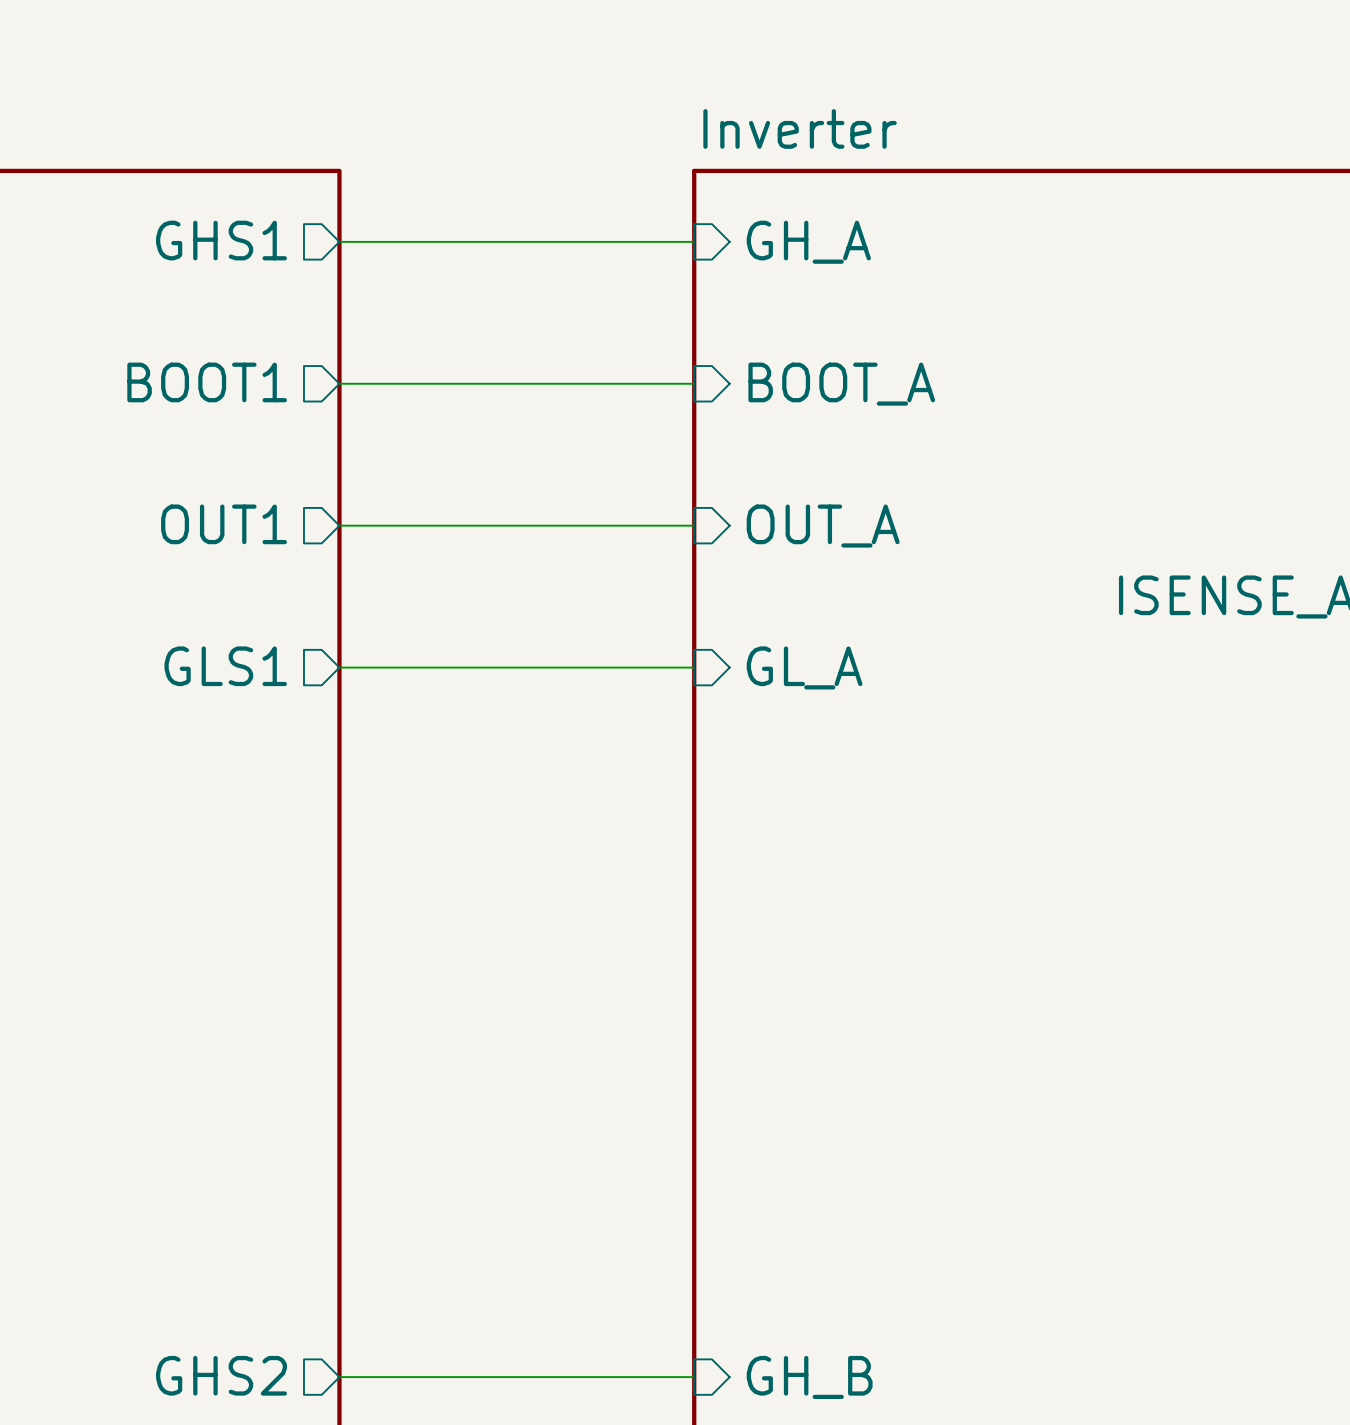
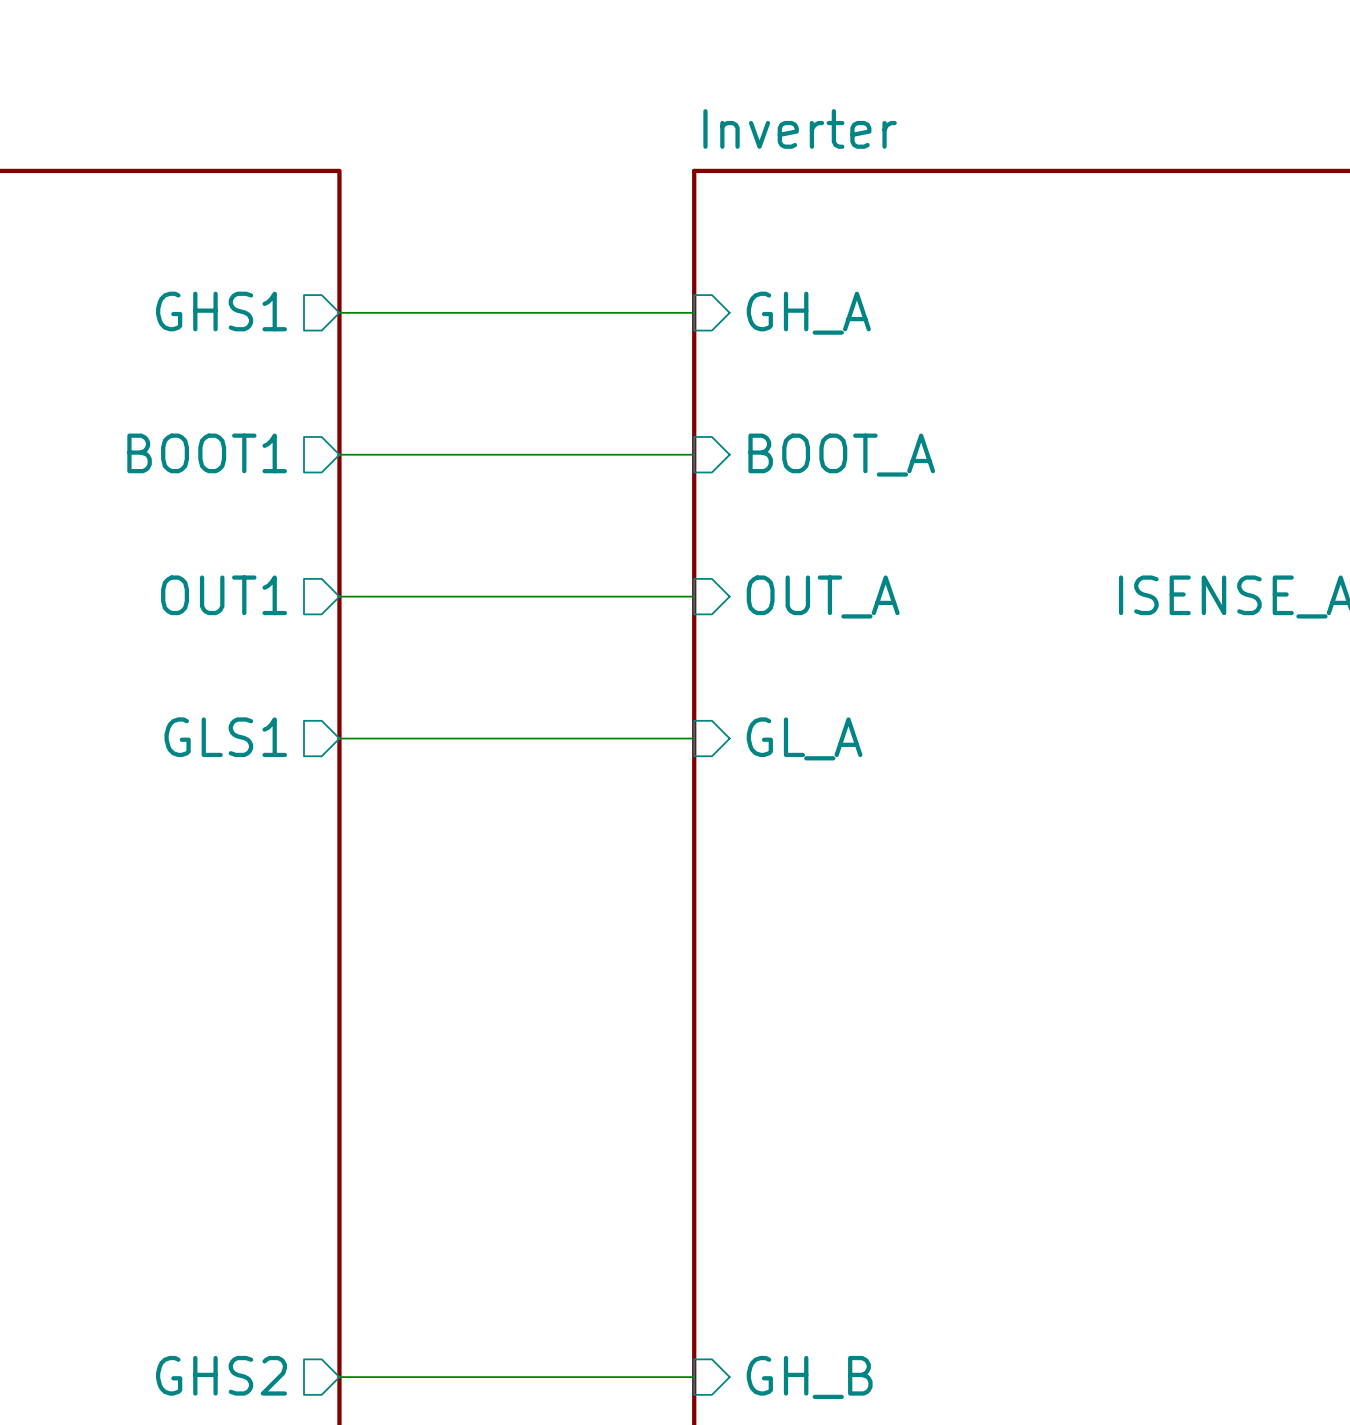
sheet pin position: GHS1 (221, 240) -> GHS1 (221, 311)
wire: (339, 241) (694, 241) -> (339, 312) (694, 312)
sheet pin position: GH_A (808, 242) -> GH_A (808, 313)
sheet pin position: BOOT1 (207, 382) -> BOOT1 (207, 453)
wire: (339, 383) (694, 383) -> (339, 454) (694, 454)
sheet pin position: BOOT_A (841, 384) -> BOOT_A (841, 455)
sheet pin position: OUT1 (224, 524) -> OUT1 (224, 595)
wire: (339, 525) (694, 525) -> (339, 596) (694, 596)
sheet pin position: OUT_A (823, 526) -> OUT_A (823, 596)
sheet pin position: GLS1 (225, 666) -> GLS1 (225, 737)
wire: (339, 667) (694, 667) -> (339, 738) (694, 738)
sheet pin position: GL_A (804, 667) -> GL_A (804, 738)

